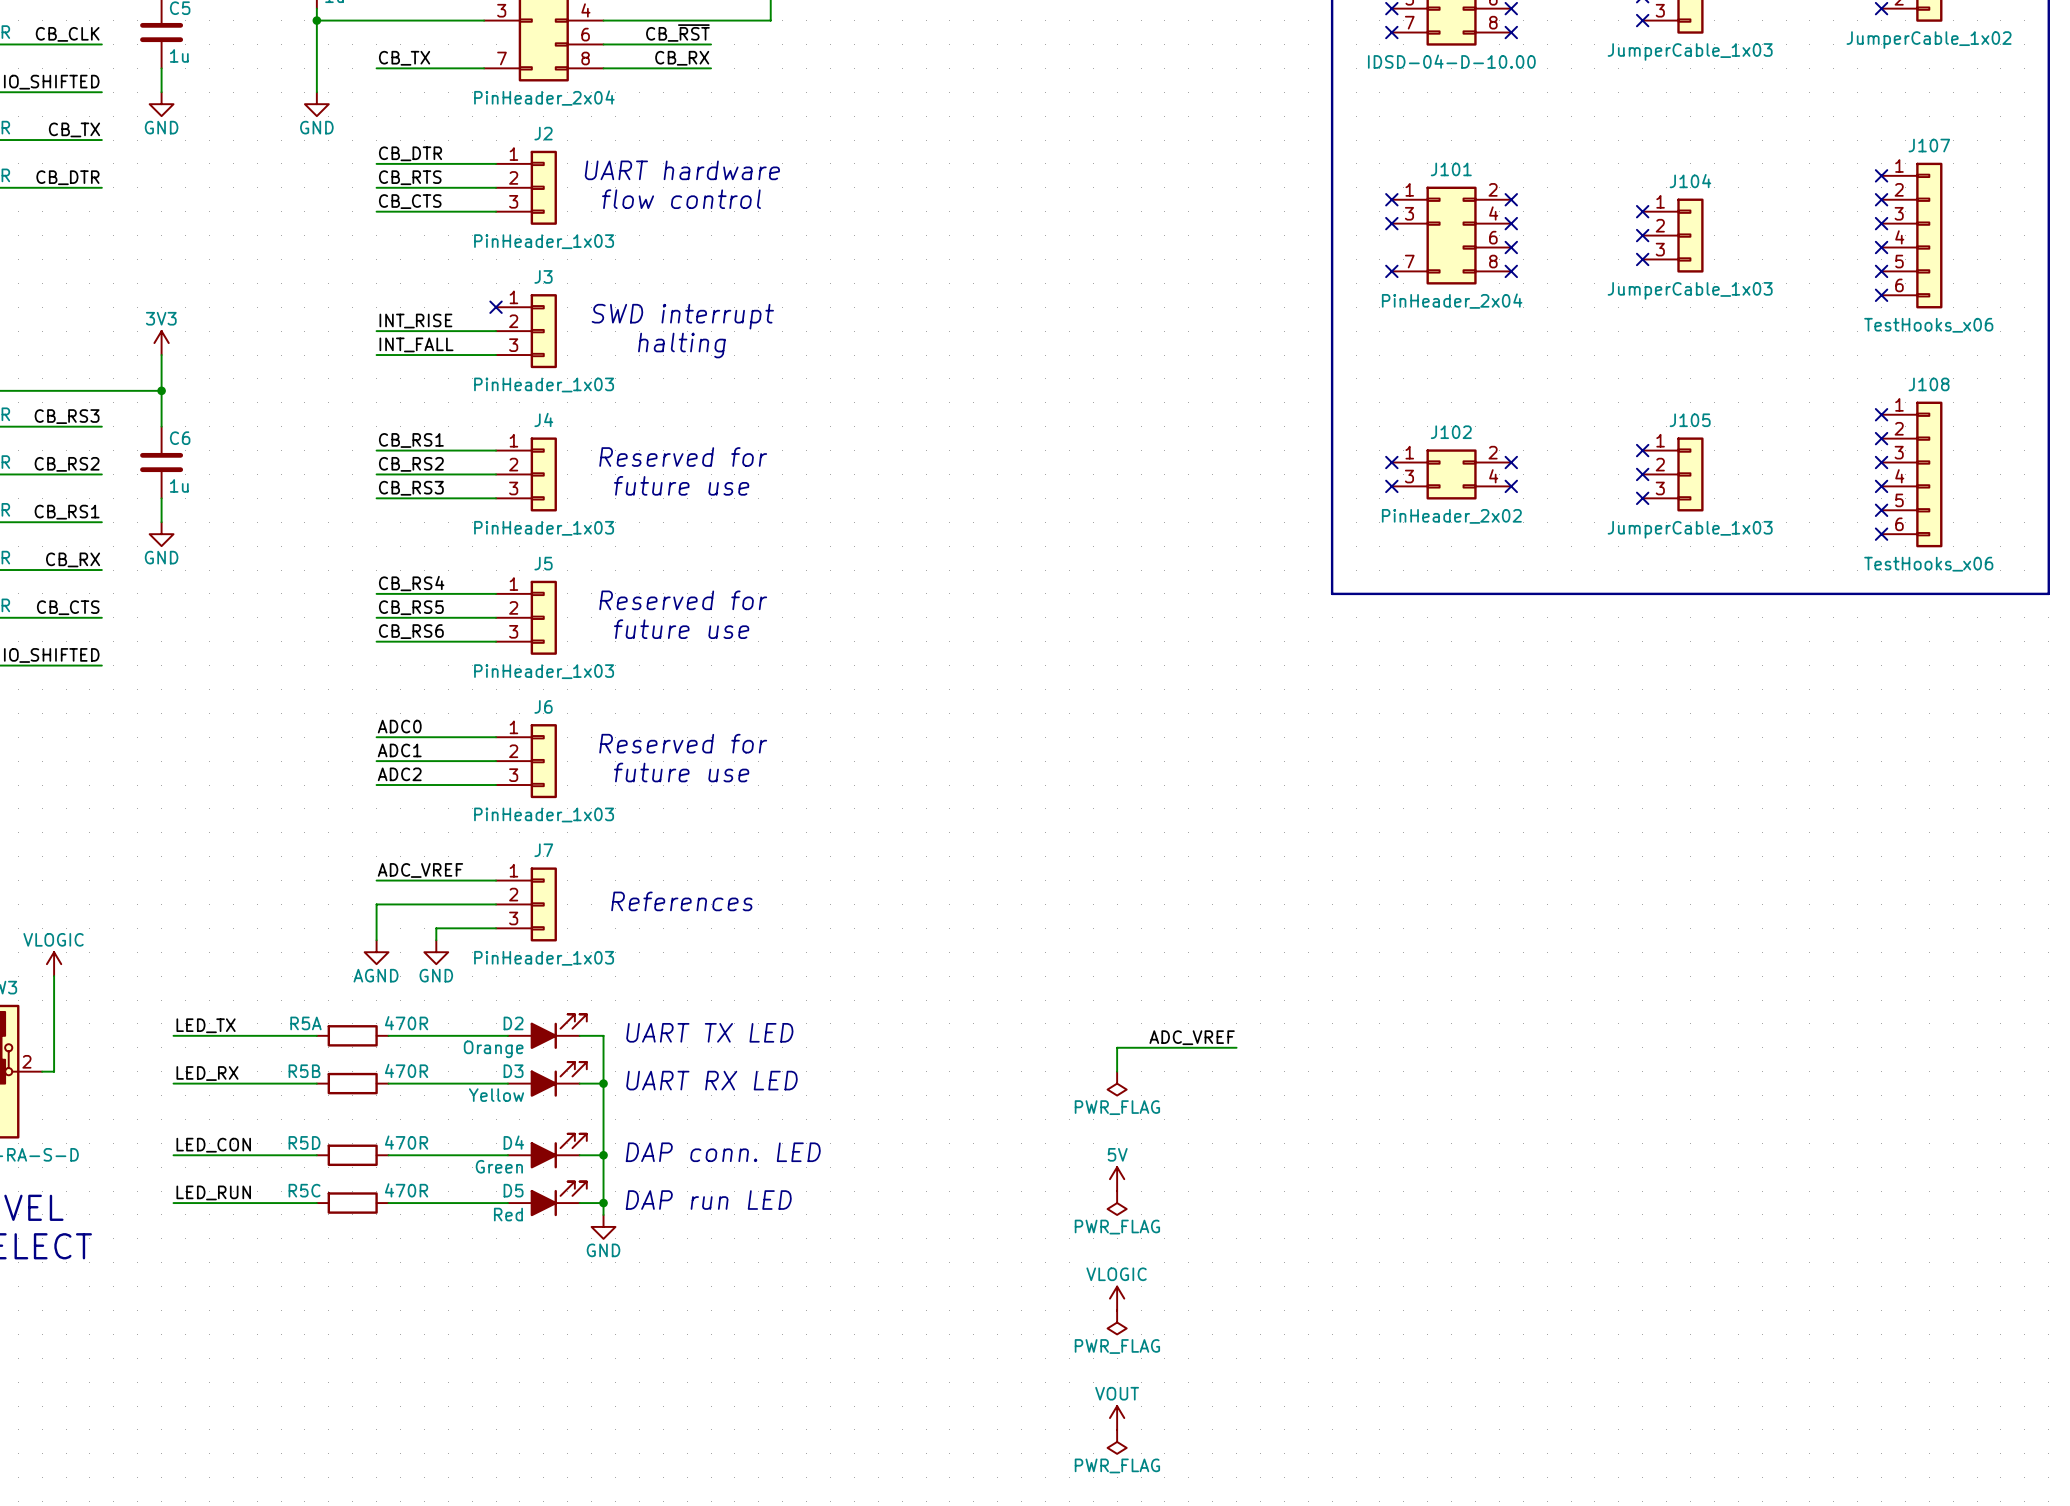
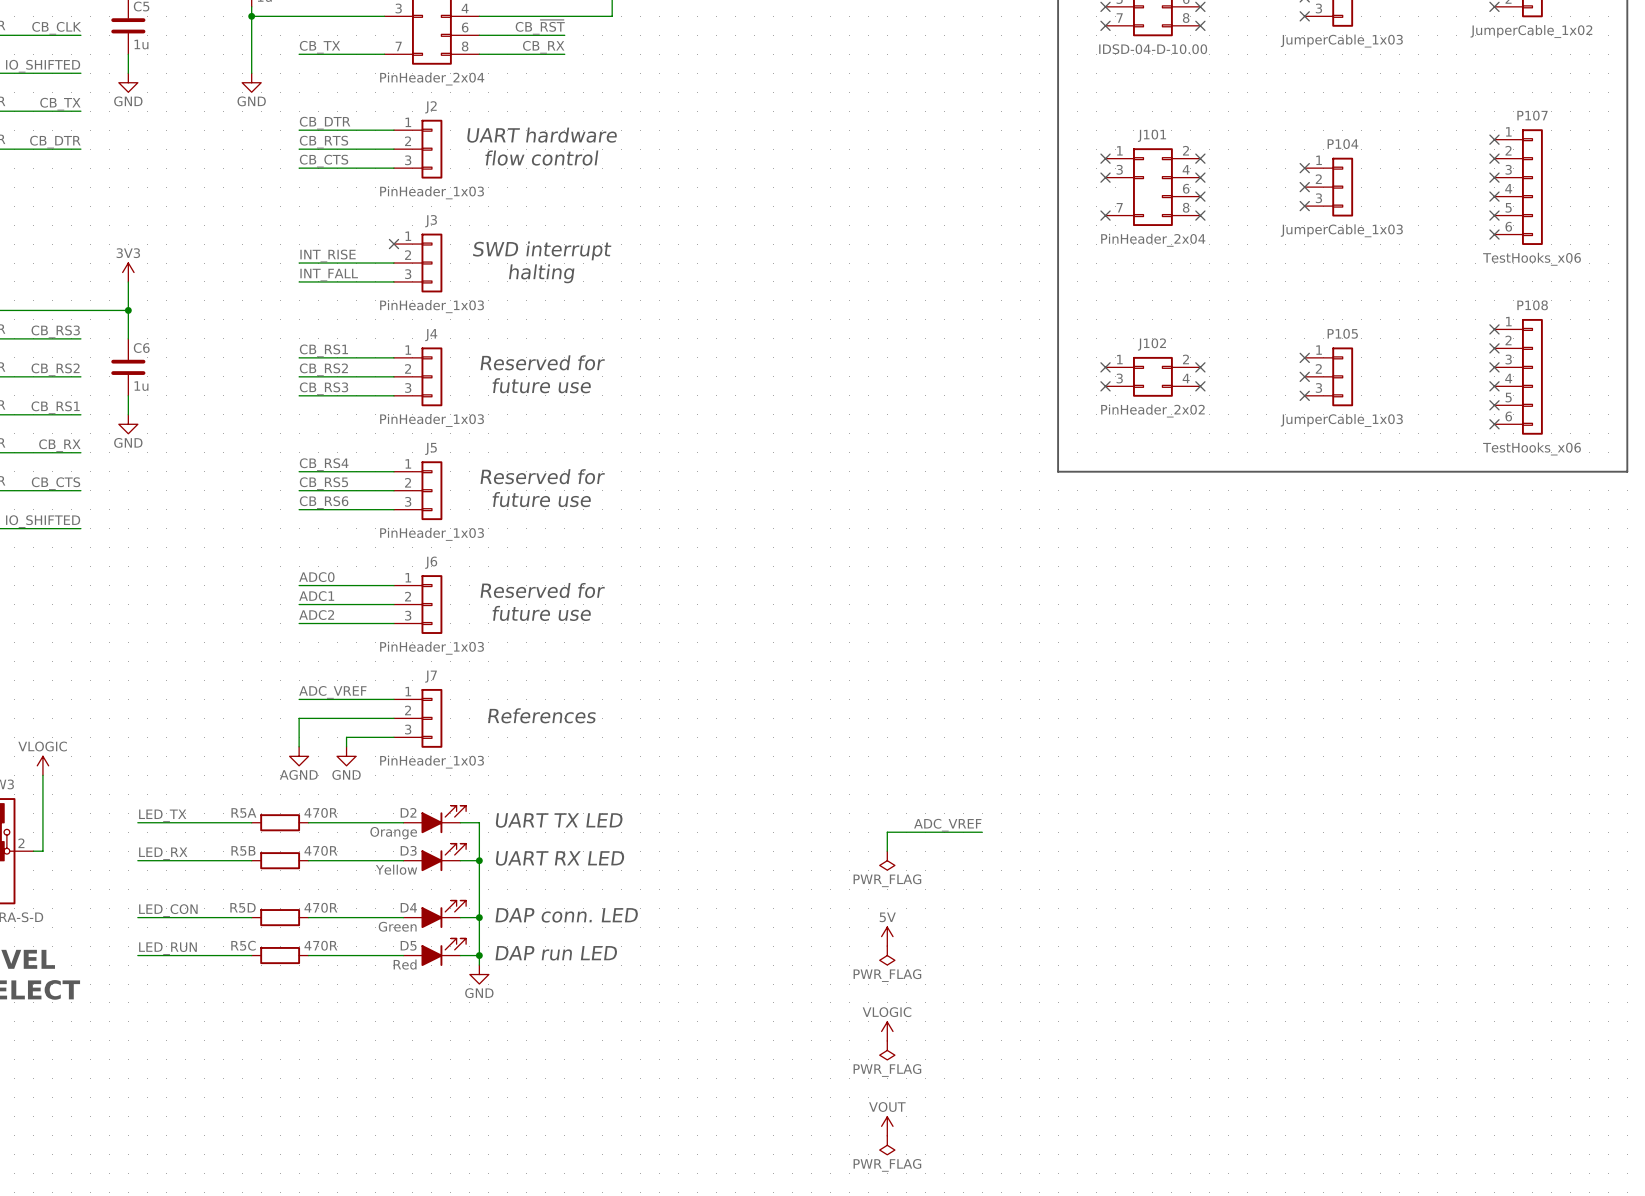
J107 name: J107 (1929, 145) -> P107 (1532, 115)
J104 name: J104 (1690, 181) -> P104 (1342, 144)
J108 name: J108 (1929, 384) -> P108 (1532, 305)
J105 name: J105 (1690, 420) -> P105 (1342, 333)

